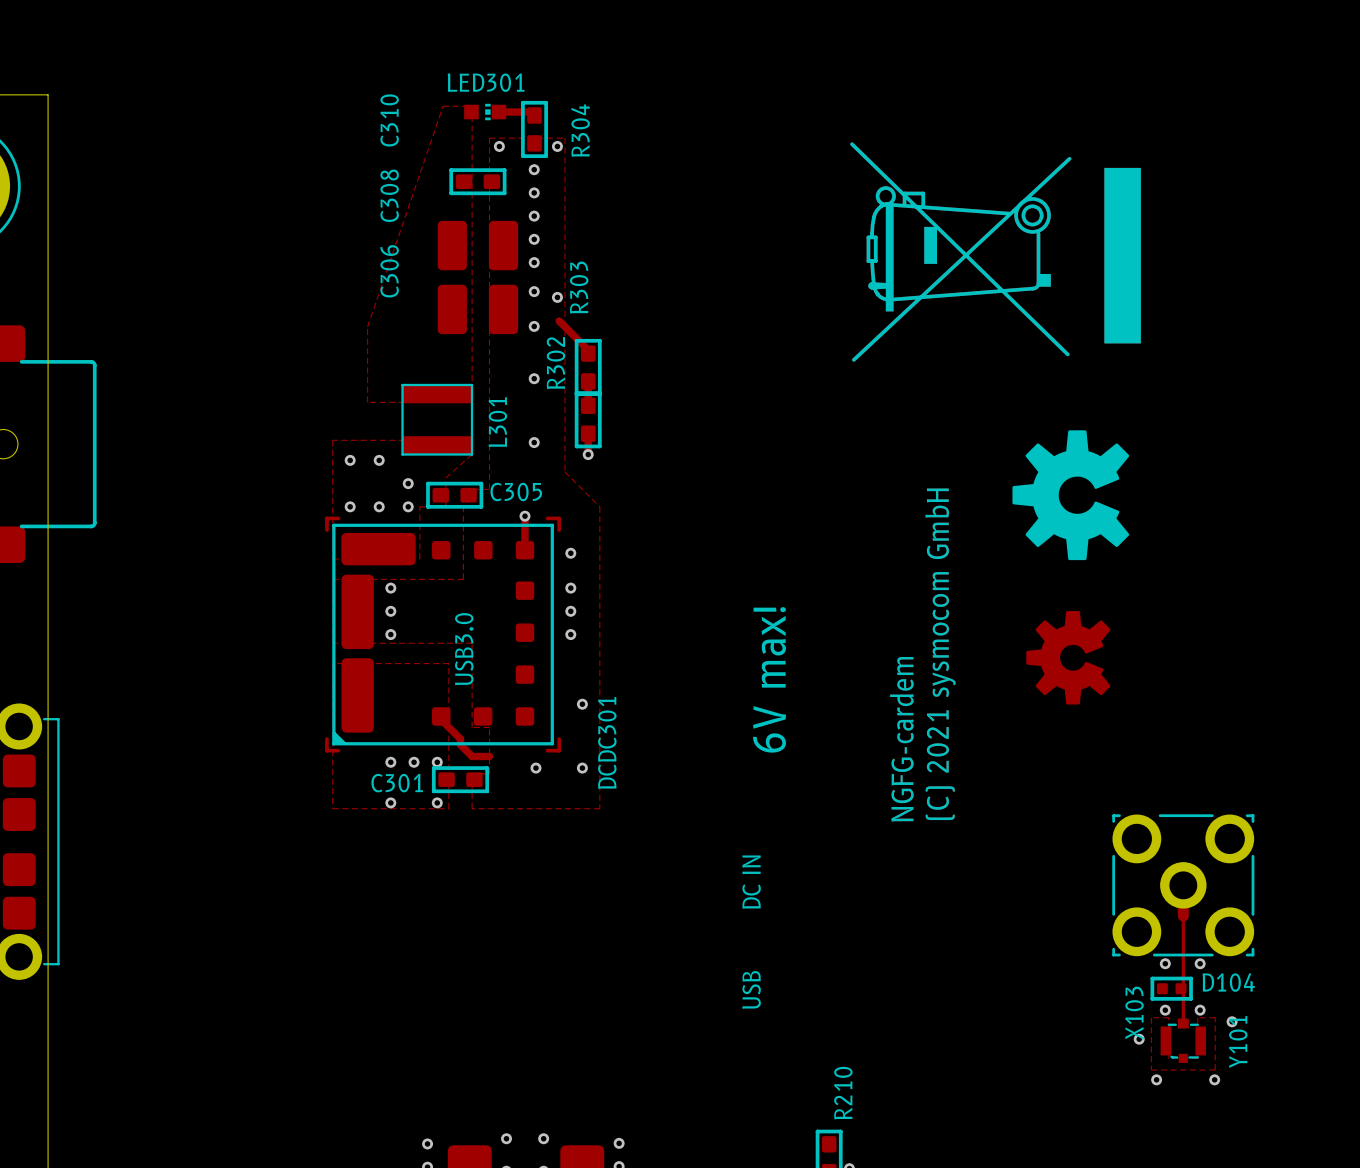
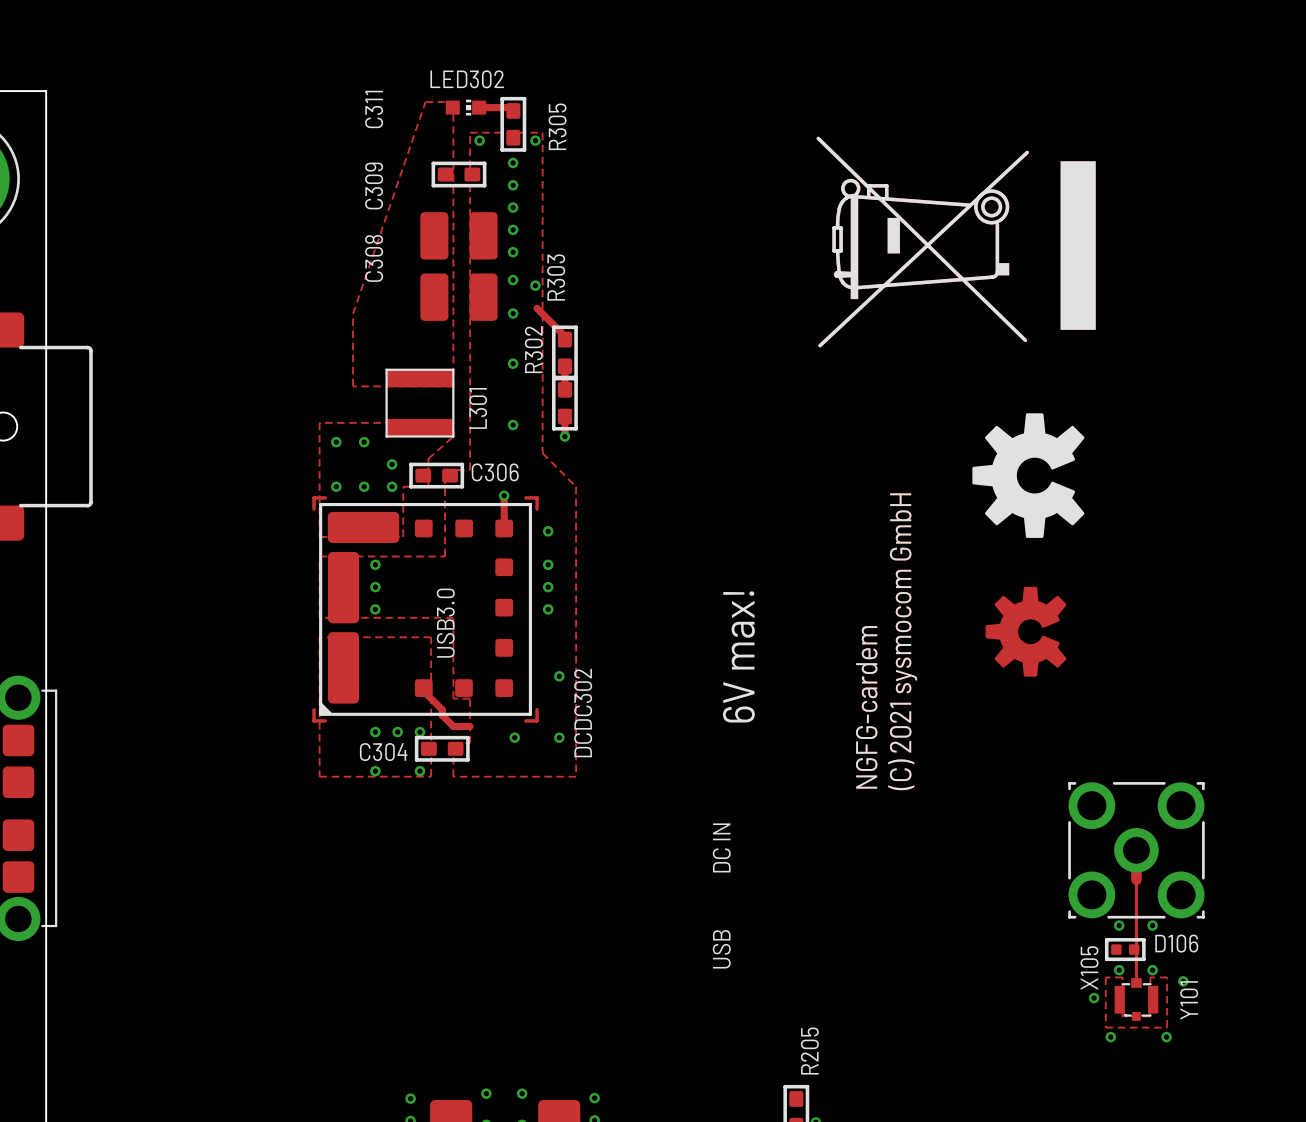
LED301 name: LED301 (486, 82) -> LED302 (467, 79)
C310 name: C310 (389, 120) -> C311 (374, 109)
R304 name: R304 (580, 130) -> R305 (557, 126)
C308 name: C308 (389, 195) -> C309 (374, 185)
C306 name: C306 (389, 271) -> C308 (374, 258)
C305 name: C305 (516, 492) -> C306 (495, 472)
DCDC301 name: DCDC301 (607, 742) -> DCDC302 (583, 713)
C301 name: C301 (397, 783) -> C304 (383, 752)
D104 name: D104 (1228, 982) -> D106 (1176, 943)
X103 name: X103 (1134, 1013) -> X105 (1089, 968)
R210 name: R210 (843, 1093) -> R205 (809, 1051)

